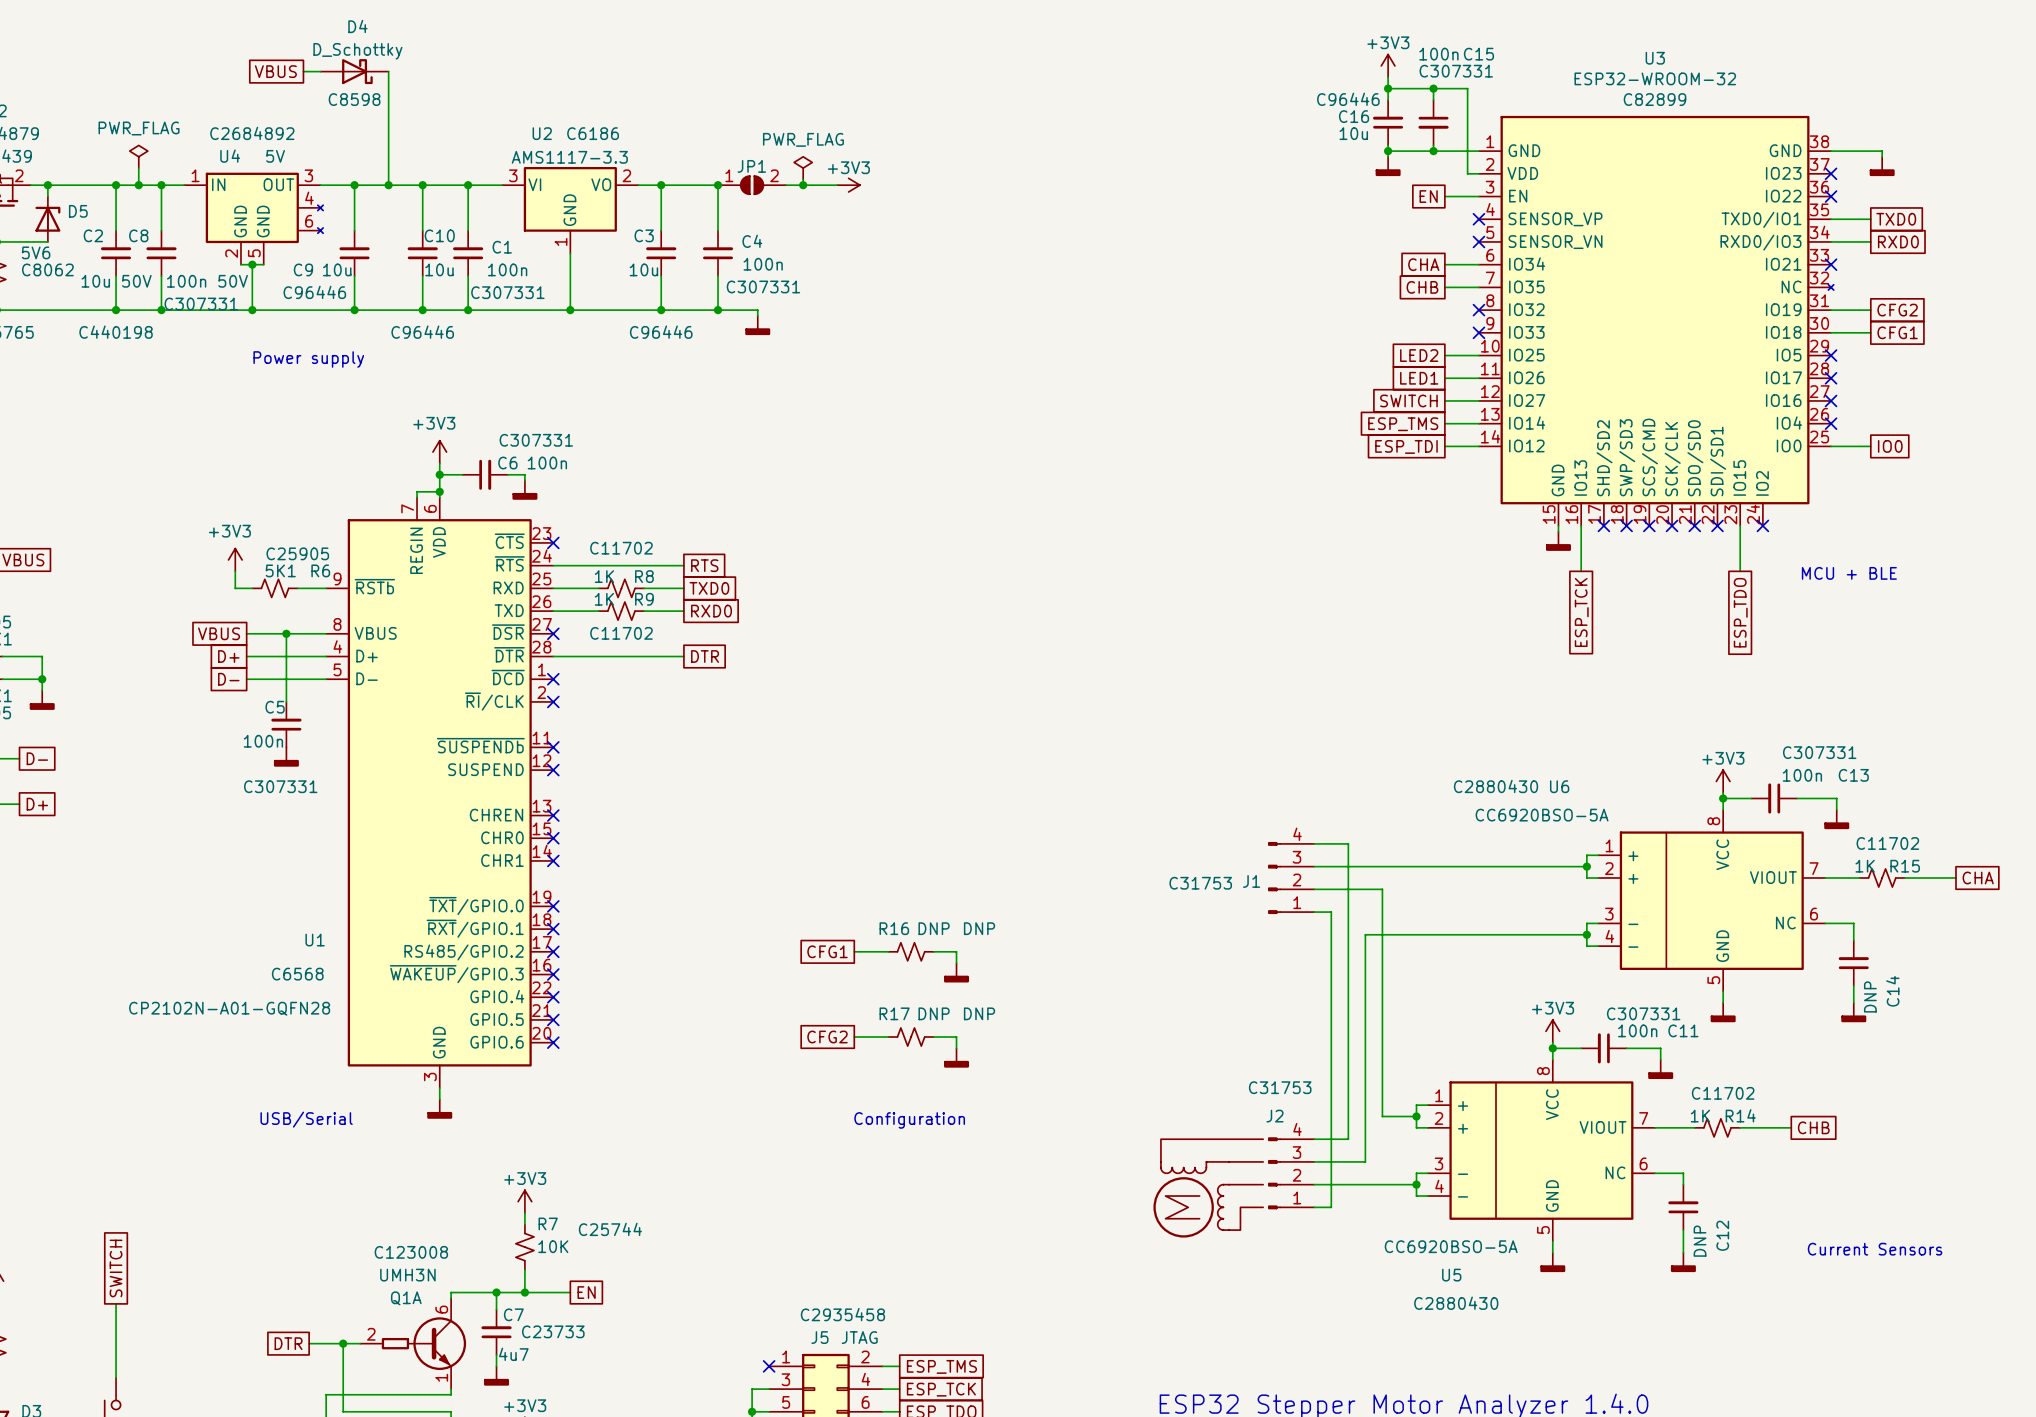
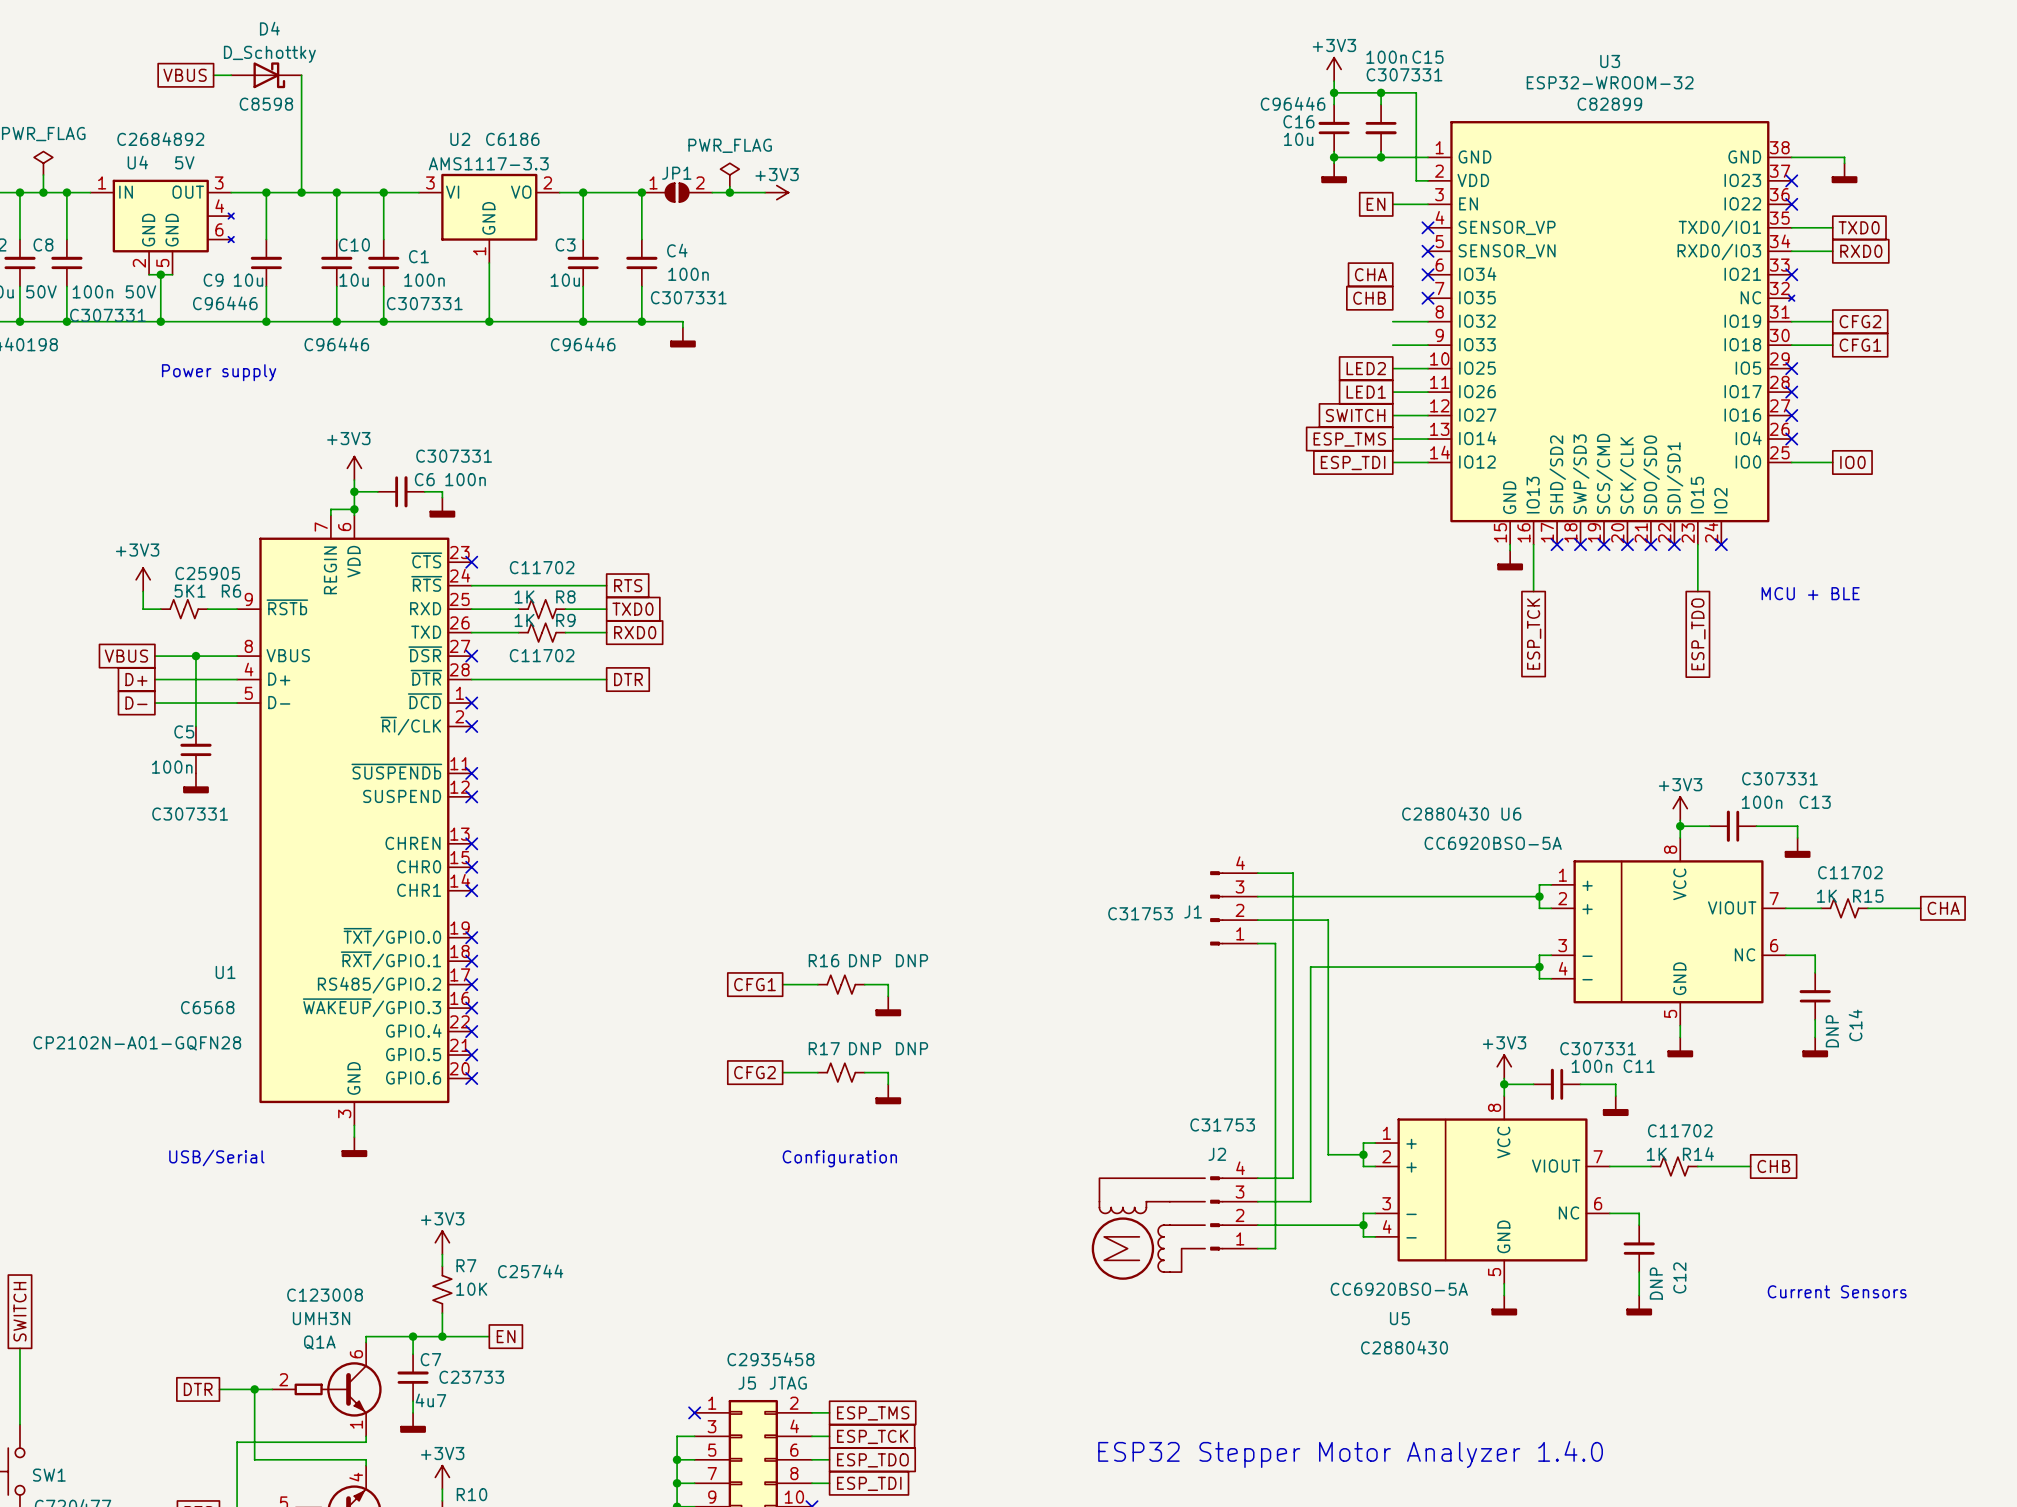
wire: (1444, 264) (1478, 264) -> (1392, 321) (1428, 321)
no-connect mark: none -> (1428, 274)
wire: (1444, 287) (1478, 287) -> (1392, 345) (1428, 345)
no-connect mark: none -> (1428, 298)
no-connect mark: (1478, 310) -> none
no-connect mark: (1478, 332) -> none

